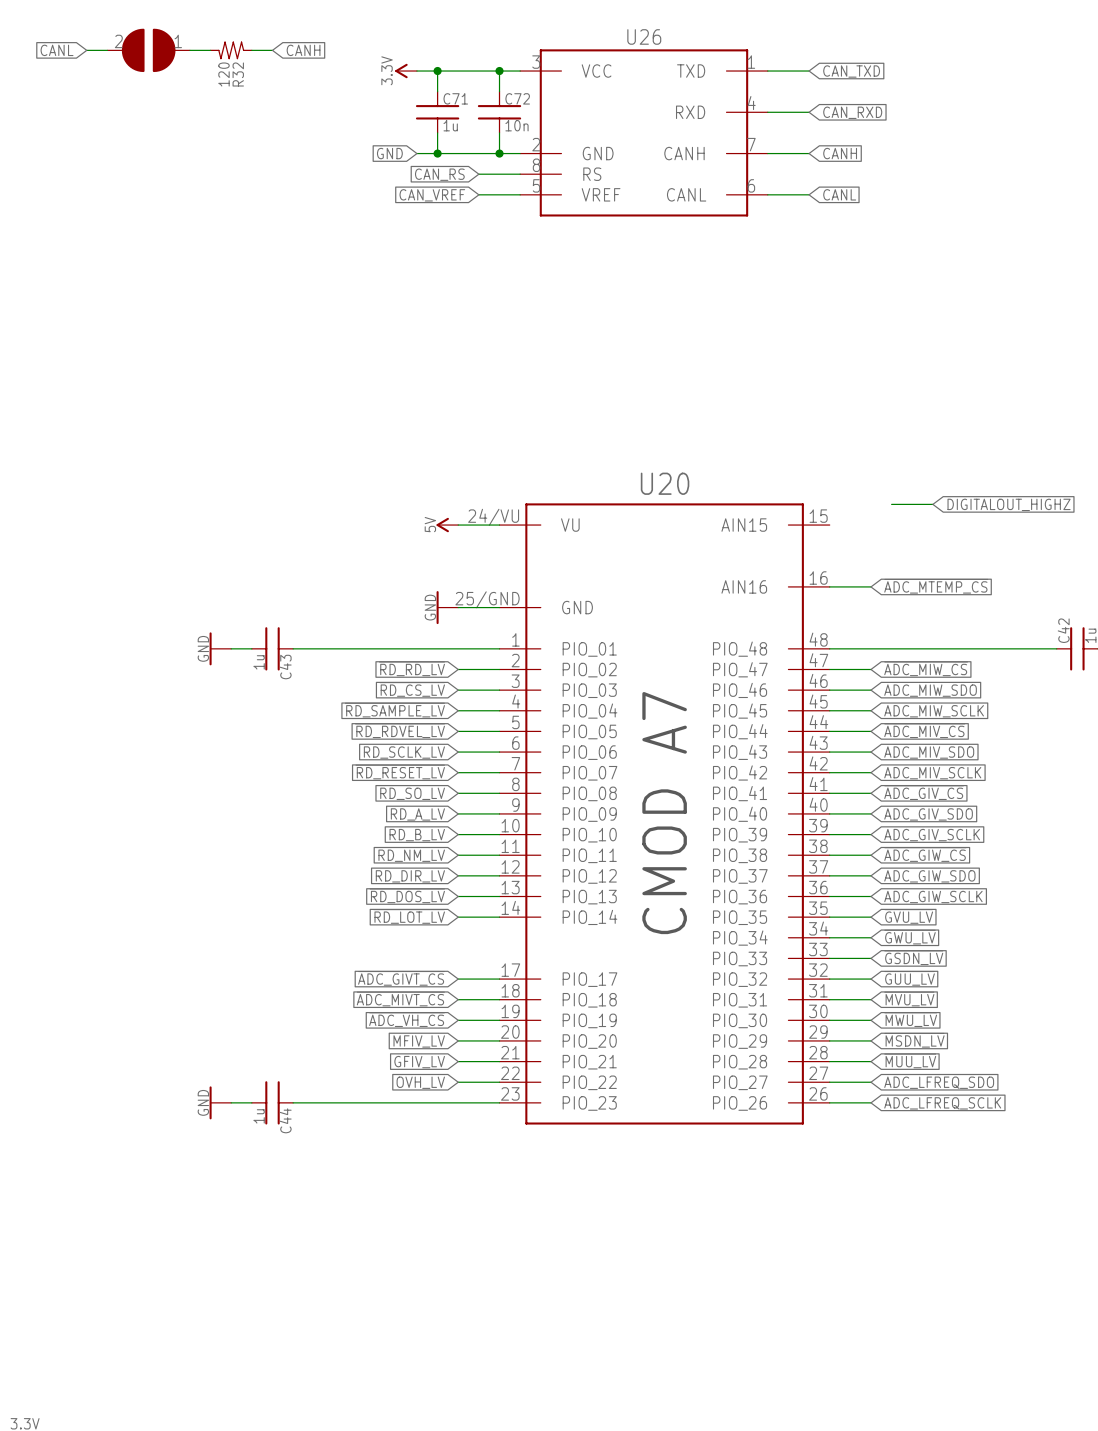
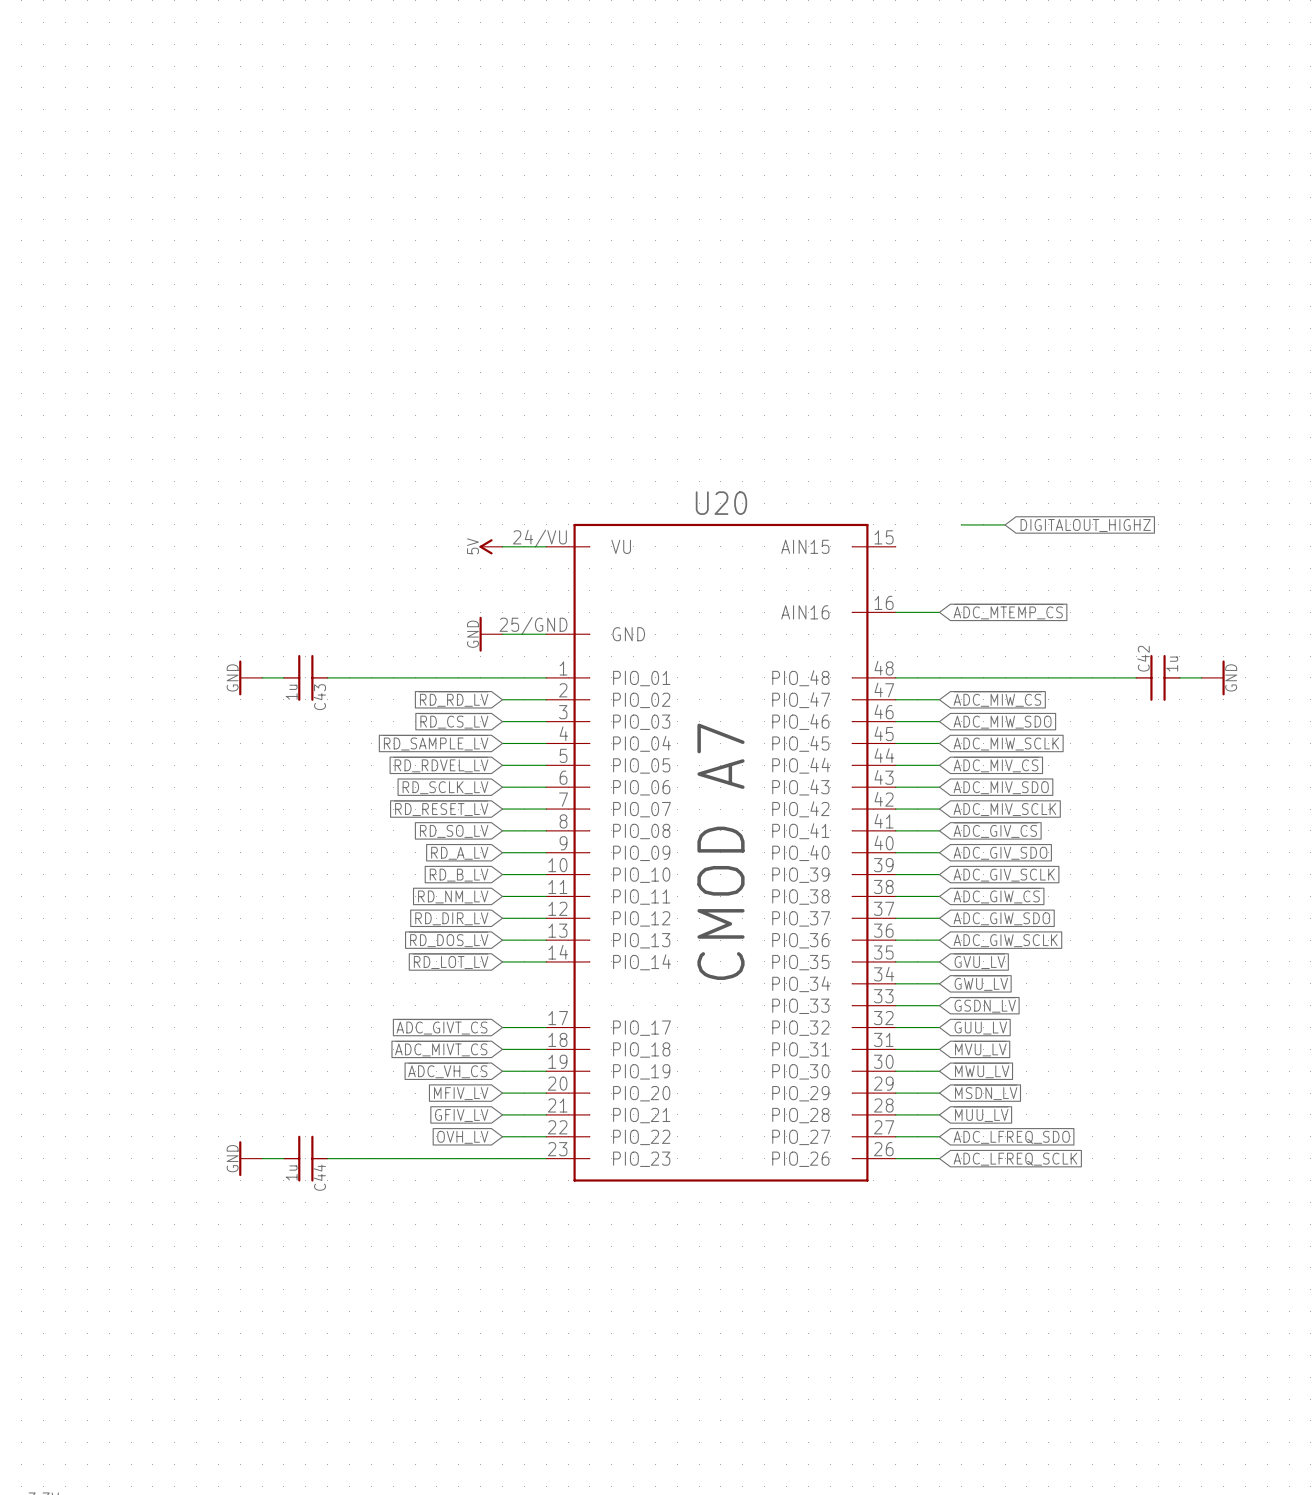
global label: CANL (57, 50) -> none
wire: (86, 50) (107, 50) -> none
part: (148, 50) -> none
wire: (189, 50) (210, 50) -> none
R32: 120 (231, 50) -> none
wire: (251, 50) (272, 50) -> none
global label: CANH (303, 50) -> none
power symbol: 3.3V (406, 71) -> none
wire: (416, 71) (520, 71) -> none
wire: (437, 71) (437, 91) -> none
junction: (437, 71) -> none
wire: (499, 71) (499, 91) -> none
junction: (499, 71) -> none
wire: (767, 71) (809, 71) -> none
global label: CAN_TXD (851, 71) -> none
C71: 1u (437, 112) -> none
C72: 10n (499, 112) -> none
wire: (767, 112) (809, 112) -> none
global label: CAN_RXD (852, 112) -> none
wire: (437, 132) (437, 153) -> none
wire: (499, 132) (499, 153) -> none
U26: (643, 132) -> none
global label: GND (389, 153) -> none
wire: (416, 153) (520, 153) -> none
junction: (437, 153) -> none
junction: (499, 153) -> none
wire: (767, 153) (809, 153) -> none
global label: CANH (840, 153) -> none
global label: CAN_RS (439, 174) -> none
wire: (478, 174) (520, 174) -> none
wire: (478, 194) (520, 194) -> none
wire: (767, 194) (809, 194) -> none
global label: CANL (839, 194) -> none
global label: CAN_VREF (432, 195) -> none

